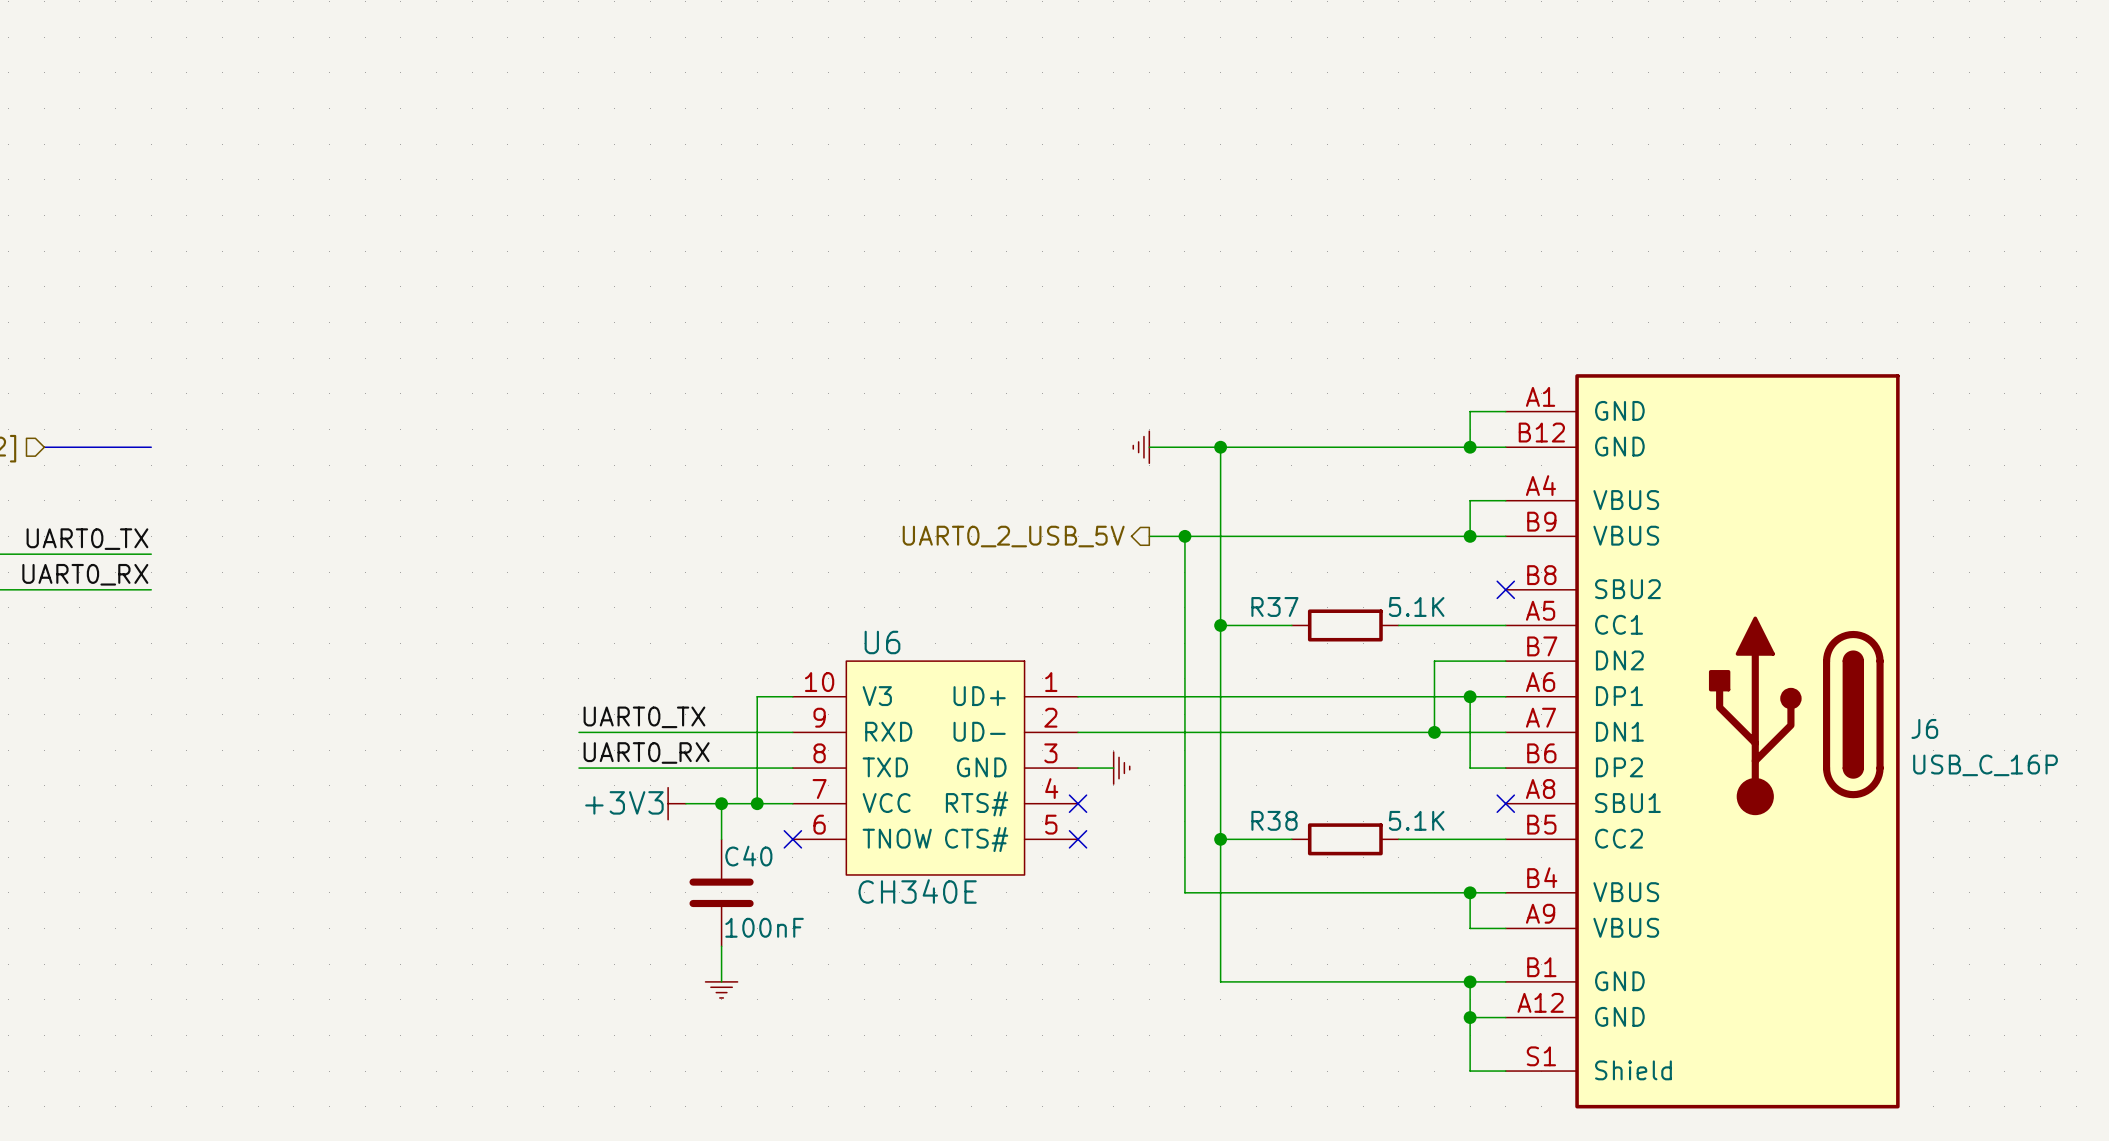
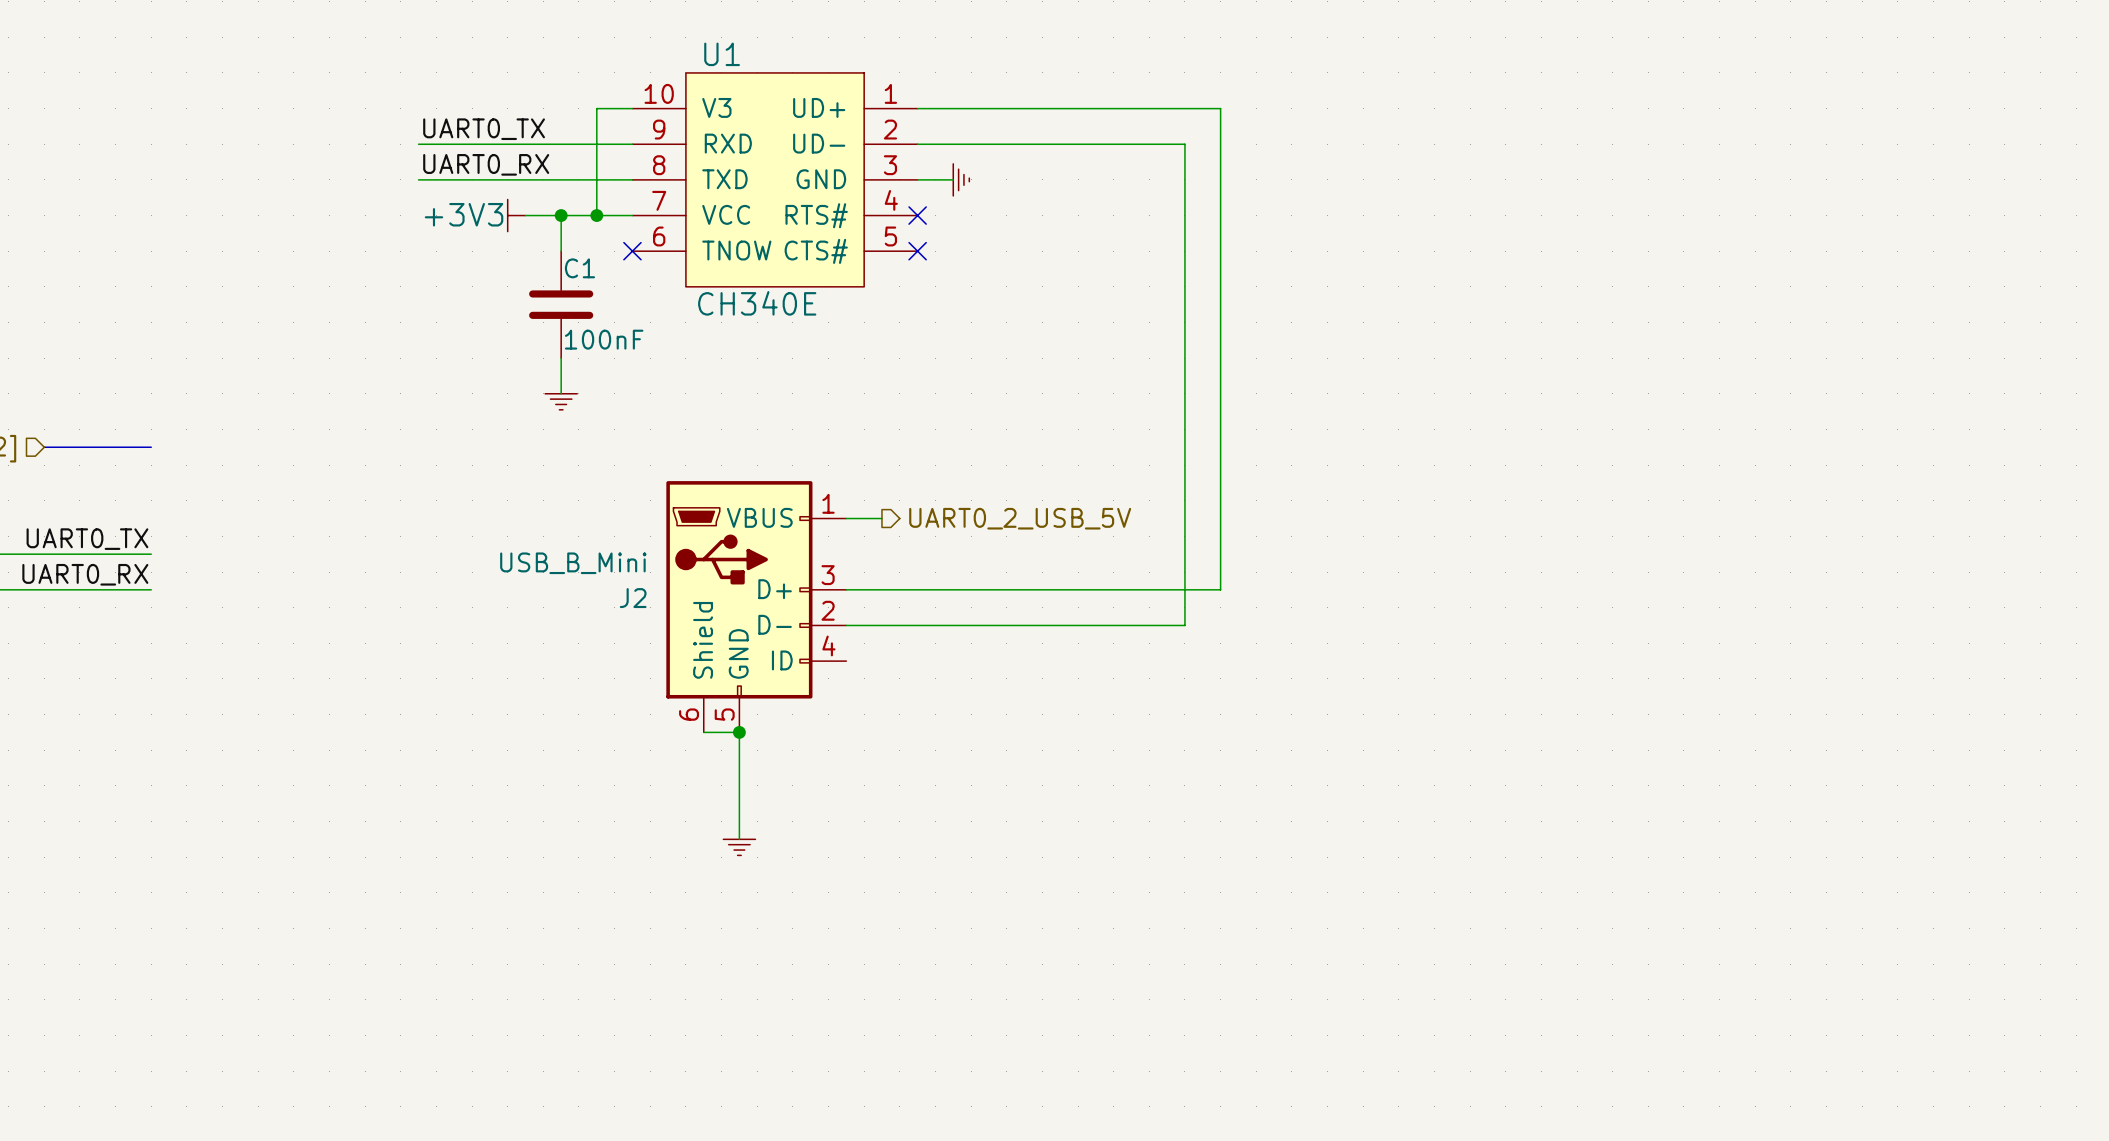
wire: none -> (632, 108) (596, 108) (596, 215)
wire: none -> (917, 108) (1220, 108) (1220, 447)
label: none -> UART0_TX (484, 129)
wire: none -> (418, 144) (632, 144)
wire: none -> (917, 144) (1184, 144) (1184, 536)
label: none -> UART0_RX (486, 164)
wire: none -> (418, 179) (632, 179)
U1: none -> CH340E (775, 179)
wire: none -> (917, 179) (953, 179)
power symbol: none -> (961, 179)
power symbol: none -> +3V3 (516, 215)
wire: none -> (525, 215) (632, 215)
wire: none -> (561, 215) (561, 251)
junction: none -> (561, 215)
junction: none -> (596, 215)
no-connect mark: none -> (917, 215)
no-connect mark: none -> (632, 251)
no-connect mark: none -> (917, 251)
C1: none -> 100nF (561, 304)
wire: none -> (561, 358) (561, 393)
power symbol: none -> (561, 401)
wire: (1505, 411) (1470, 411) (1470, 447) -> none
power symbol: (1141, 447) -> none
wire: (1149, 447) (1505, 447) -> none
junction: (1220, 447) -> none
junction: (1470, 447) -> none
wire: (1505, 500) (1470, 500) (1470, 536) -> none
hierarchical label rotation: 0° (1013, 536) -> 180° (1020, 518)
wire: (1149, 536) (1505, 536) -> none
junction: (1184, 536) -> none
junction: (1470, 536) -> none
wire: (1220, 589) (1220, 981) (1505, 981) -> (1220, 589) (846, 589)
no-connect mark: (1505, 589) -> none
J2: none -> USB_B_Mini (756, 606)
wire: (1184, 625) (1184, 892) (1505, 892) -> (1184, 625) (846, 625)
wire: (1220, 625) (1291, 625) -> none
junction: (1220, 625) -> none
R37: 5.1K (1345, 625) -> none
wire: (1398, 625) (1505, 625) -> none
wire: (1505, 661) (1434, 661) (1434, 732) -> none
wire: (792, 696) (757, 696) (757, 803) -> none
wire: (1078, 696) (1505, 696) -> none
wire: (1470, 696) (1470, 768) (1505, 768) -> none
junction: (1470, 696) -> none
label: UART0_TX (644, 717) -> none
wire: (578, 732) (703, 732) -> none
wire: (739, 732) (792, 732) -> (739, 732) (739, 839)
junction: none -> (739, 732)
wire: (1078, 732) (1505, 732) -> none
junction: (1434, 732) -> none
J6: USB_C_16P (1702, 741) -> none
label: UART0_RX (646, 752) -> none
wire: (578, 768) (792, 768) -> none
U6: CH340E (935, 768) -> none
wire: (1078, 768) (1113, 768) -> (846, 518) (881, 518)
power symbol: (1121, 768) -> none
power symbol: +3V3 (677, 803) -> none
wire: (685, 803) (792, 803) -> none
wire: (721, 803) (721, 839) -> none
junction: (721, 803) -> none
junction: (757, 803) -> none
no-connect mark: (1078, 803) -> none
no-connect mark: (1505, 803) -> none
no-connect mark: (792, 839) -> none
no-connect mark: (1078, 839) -> none
wire: (1220, 839) (1291, 839) -> none
junction: (1220, 839) -> none
R38: 5.1K (1345, 839) -> none
wire: (1398, 839) (1505, 839) -> none
C40: 100nF (721, 892) -> none
wire: (1470, 892) (1470, 928) (1505, 928) -> none
junction: (1470, 892) -> none
wire: (721, 946) (721, 981) -> none
wire: (1470, 981) (1470, 1071) (1505, 1071) -> none
junction: (1470, 981) -> none
power symbol position: (721, 989) -> (739, 847)
wire: (1470, 1017) (1505, 1017) -> none
junction: (1470, 1017) -> none

